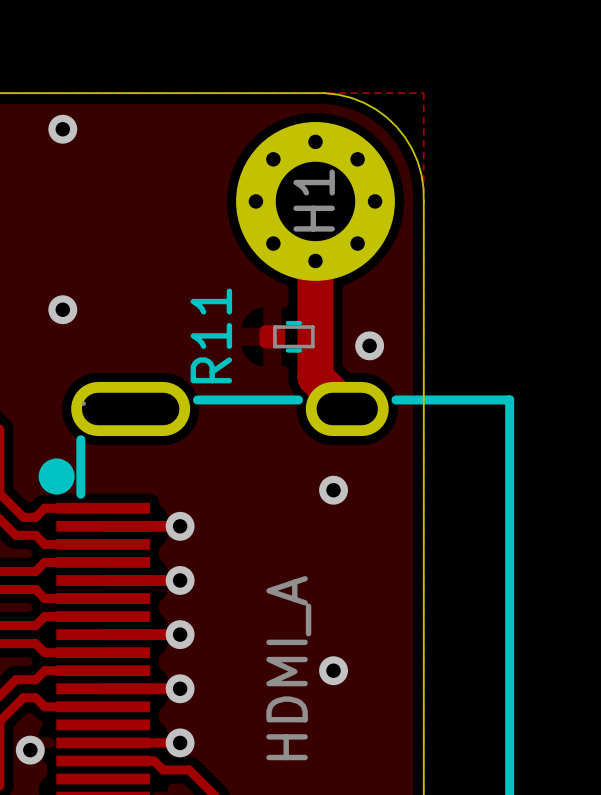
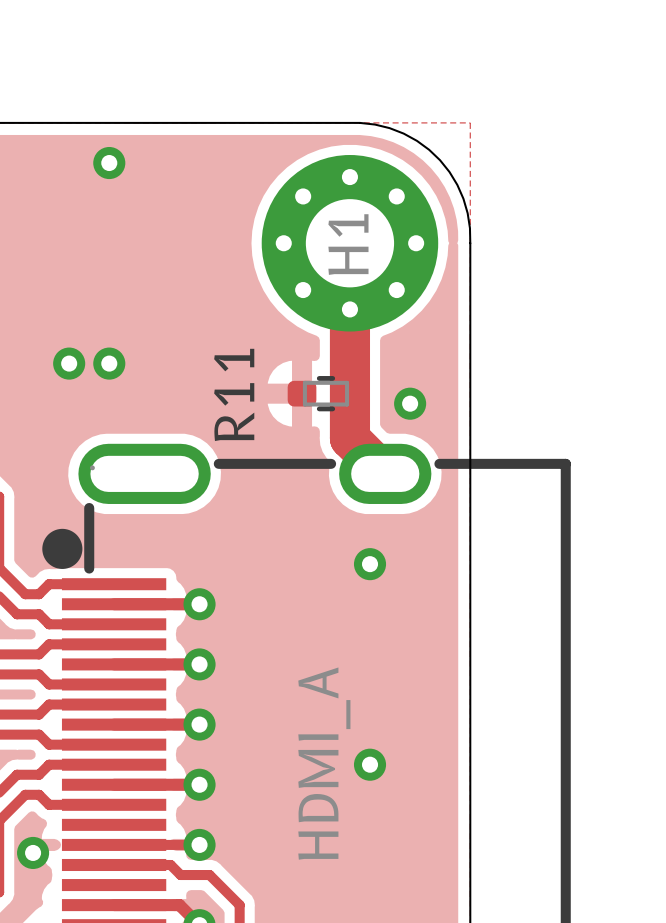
via position: (62, 129) -> (109, 163)
via: none -> (109, 363)

